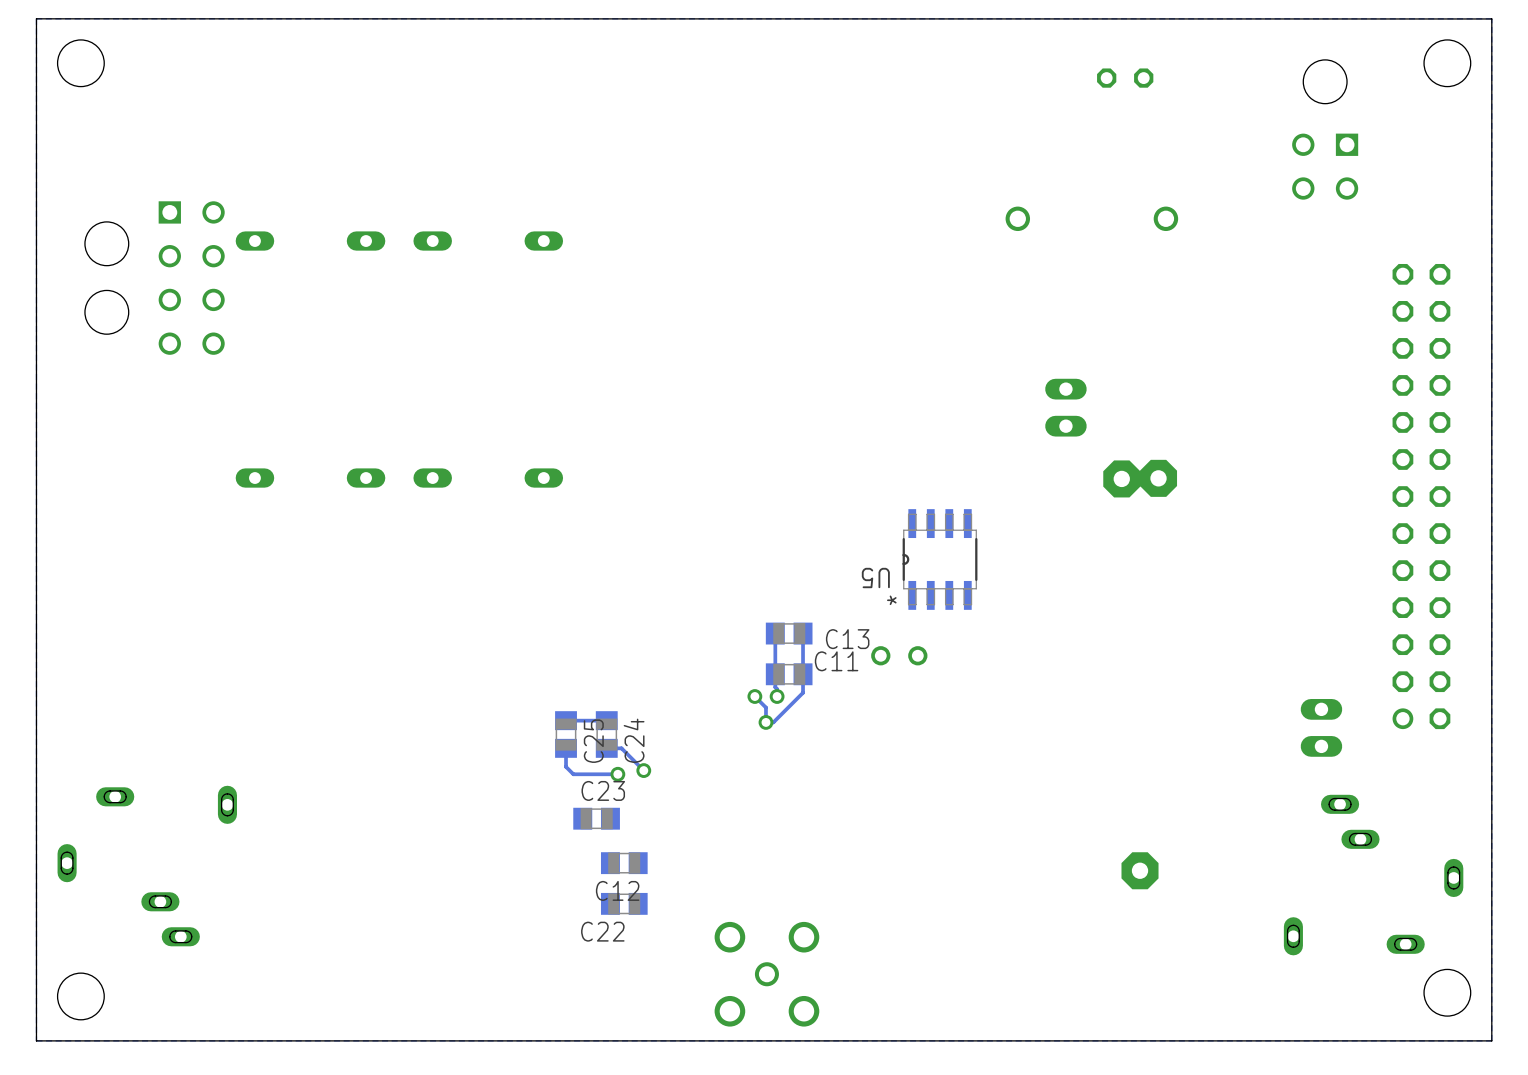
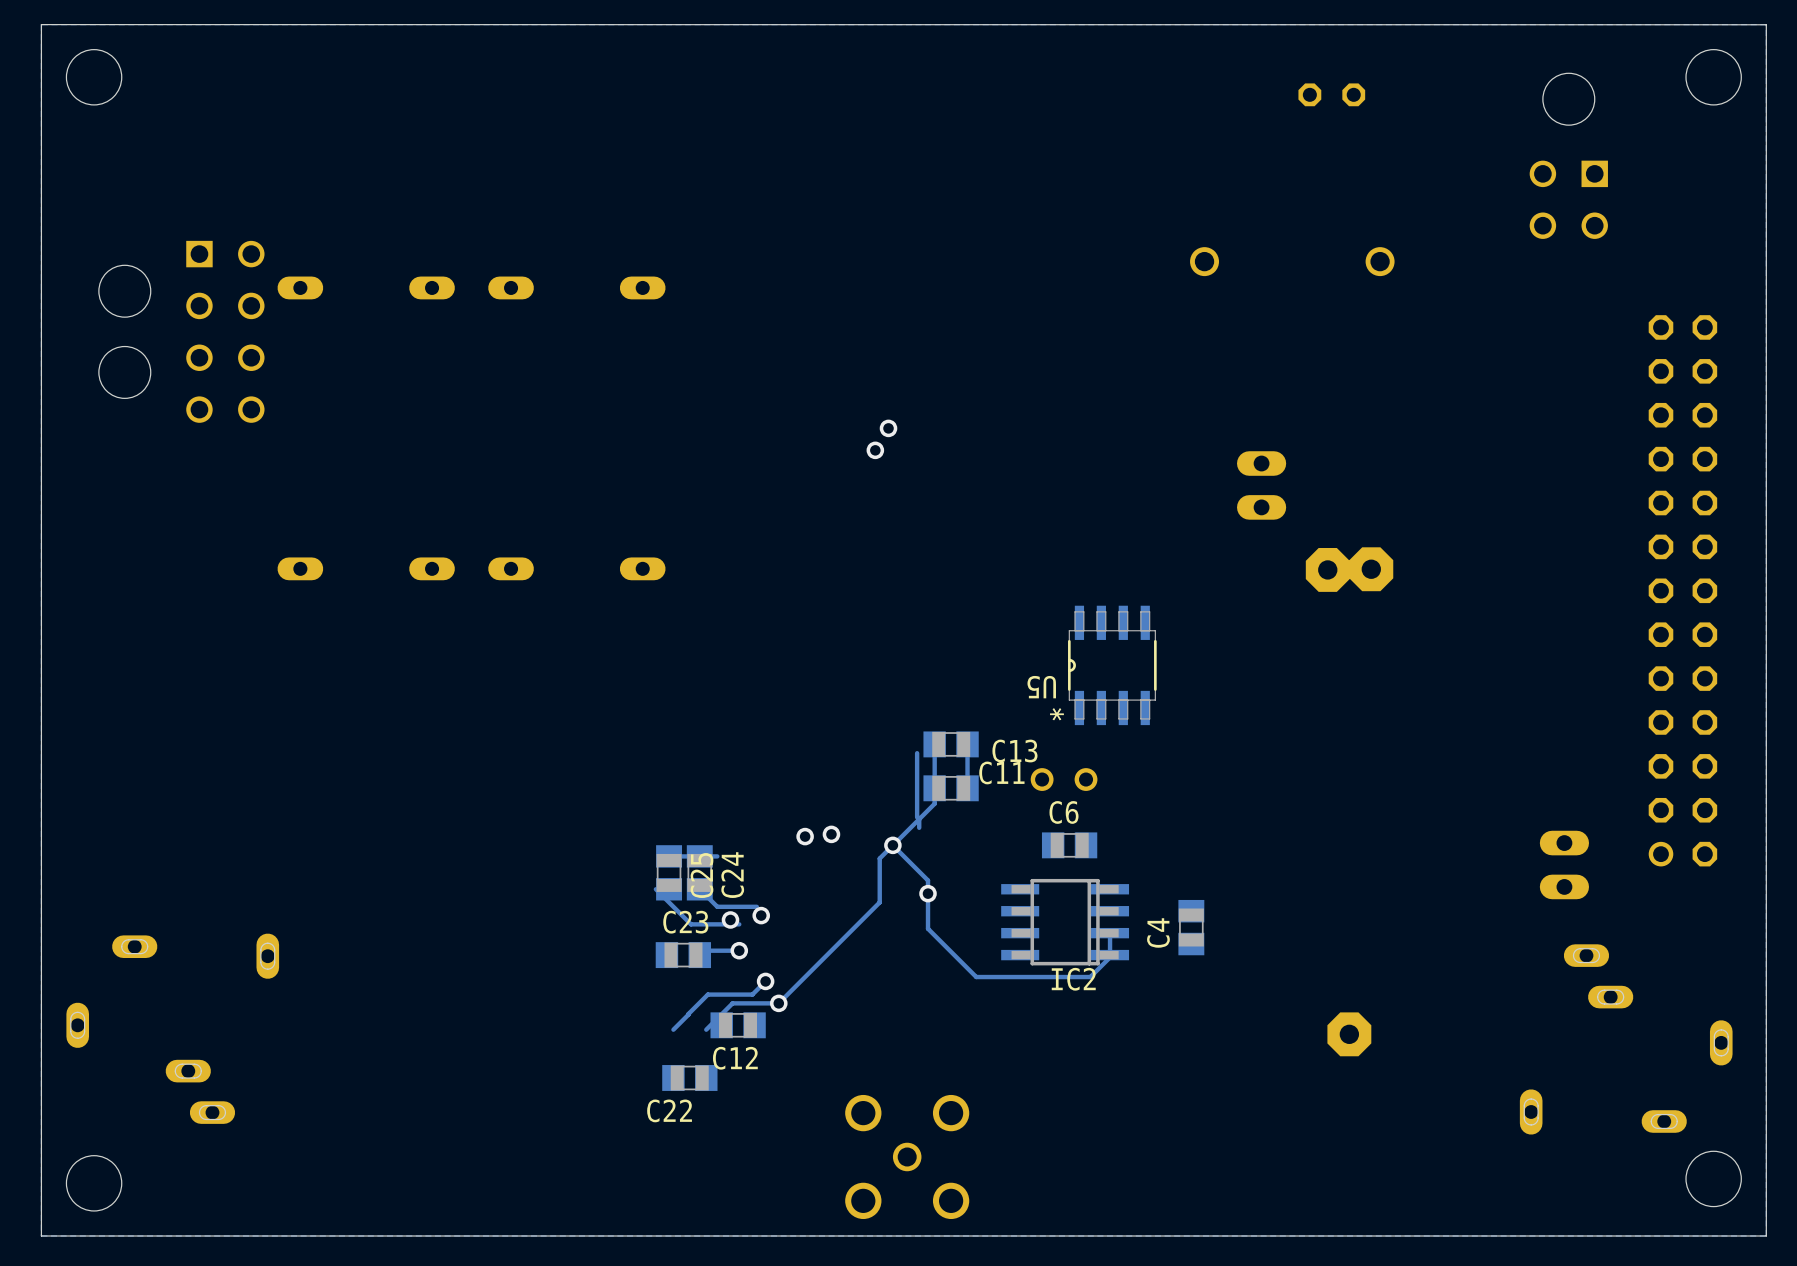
via: none -> (888, 428)
via: none -> (875, 450)
track: none -> (934, 744) (934, 803) (893, 845)
track: none -> (967, 744) (967, 788)
C13 position: (789, 633) -> (951, 744)
track: (803, 633) (803, 692) (773, 722) (765, 722) (765, 707) (754, 696) -> none
C11 position: (789, 674) -> (951, 788)
via: (754, 696) -> none
via: (777, 696) -> none
via: none -> (831, 834)
via: none -> (805, 836)
via: none -> (892, 845)
C6: none -> (1069, 845)
via: (765, 722) -> none
C24 position: (606, 734) -> (699, 872)
track: none -> (655, 889) (691, 924) (739, 924)
track: (566, 748) (566, 766) (573, 774) (617, 774) -> none
track: none -> (699, 889) (717, 906) (756, 906)
track: (606, 748) (621, 748) (643, 770) -> none
via: none -> (928, 893)
IC2: none -> (1065, 922)
C4: none -> (1191, 927)
track: none -> (1110, 933) (1110, 957) (1090, 977) (976, 977) (928, 928) (928, 880) (892, 845) (879, 858) (879, 902) (778, 1003) (732, 1003) (706, 1029)
track: none -> (739, 950) (704, 950) (699, 955)
via: none -> (739, 950)
C23 position: (596, 818) -> (683, 955)
track: none -> (765, 981) (752, 994) (707, 994) (673, 1029)
via: none -> (765, 981)
via: none -> (778, 1003)
C22 position: (624, 903) -> (689, 1077)

